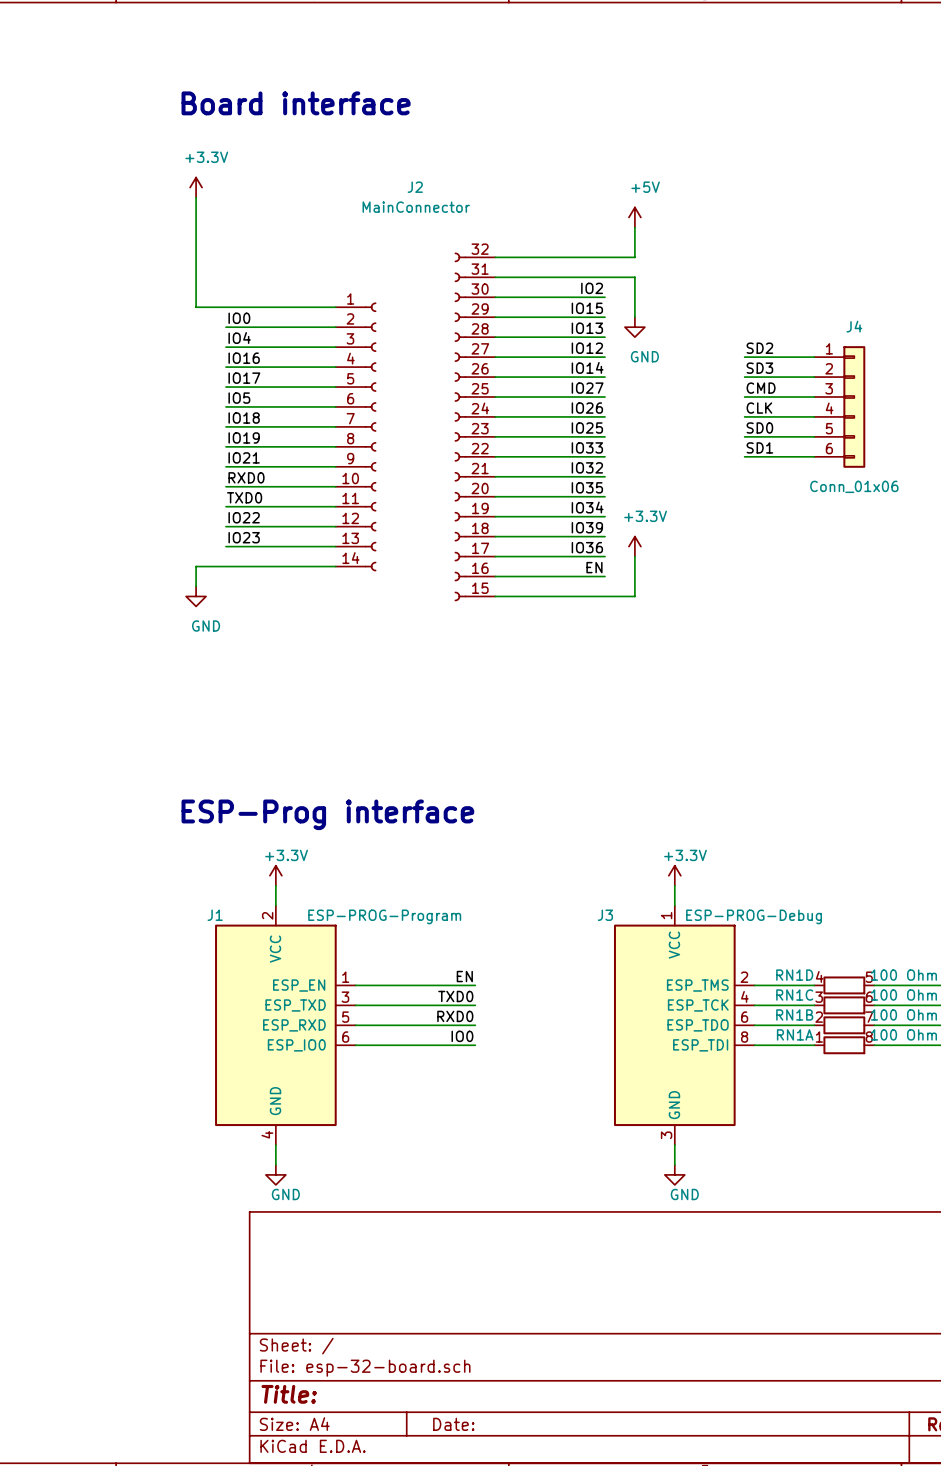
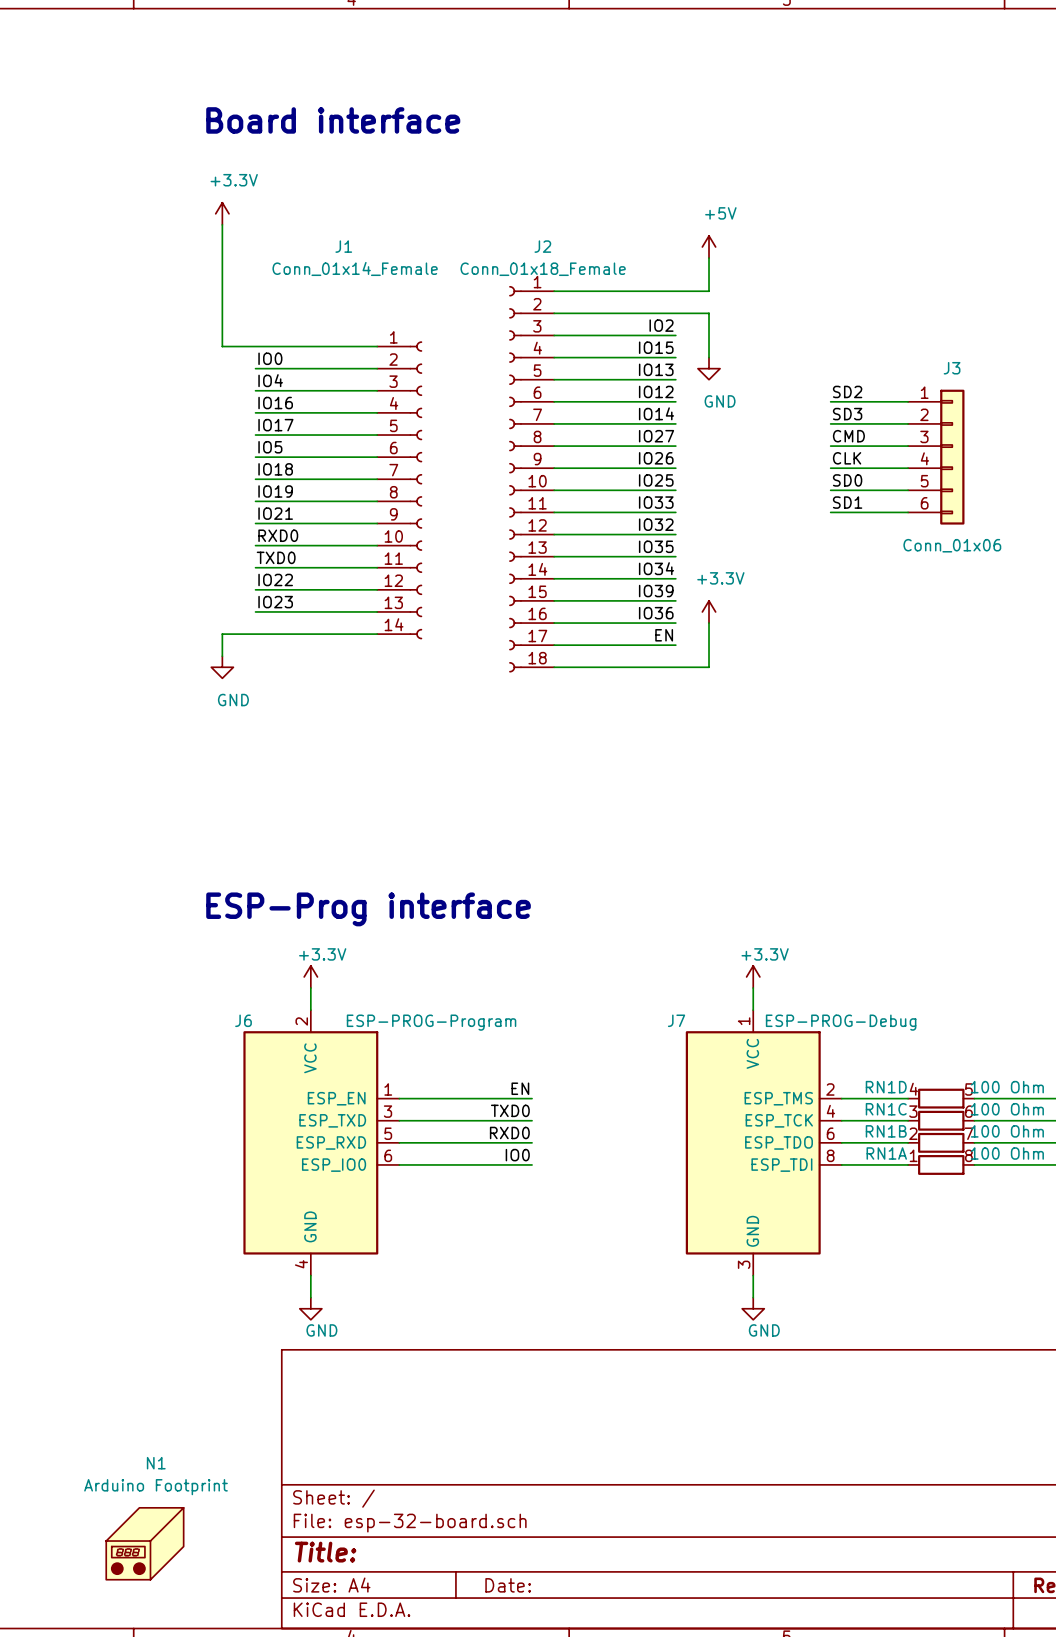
J2 name position: J2 (415, 187) -> J2 (542, 246)
J2 value: MainConnector (416, 207) -> Conn_01x18_Female (543, 269)
J2 symbol: [335, 252, 496, 602] -> [509, 286, 555, 673]
J4 name: J4 (854, 326) -> J3 (952, 368)
J1: none -> Conn_01x14_Female (399, 490)
J1 name: J1 (215, 915) -> J6 (243, 1020)
J3 name: J3 (605, 915) -> J7 (676, 1020)
N1: none -> Arduino Footprint (144, 1543)

